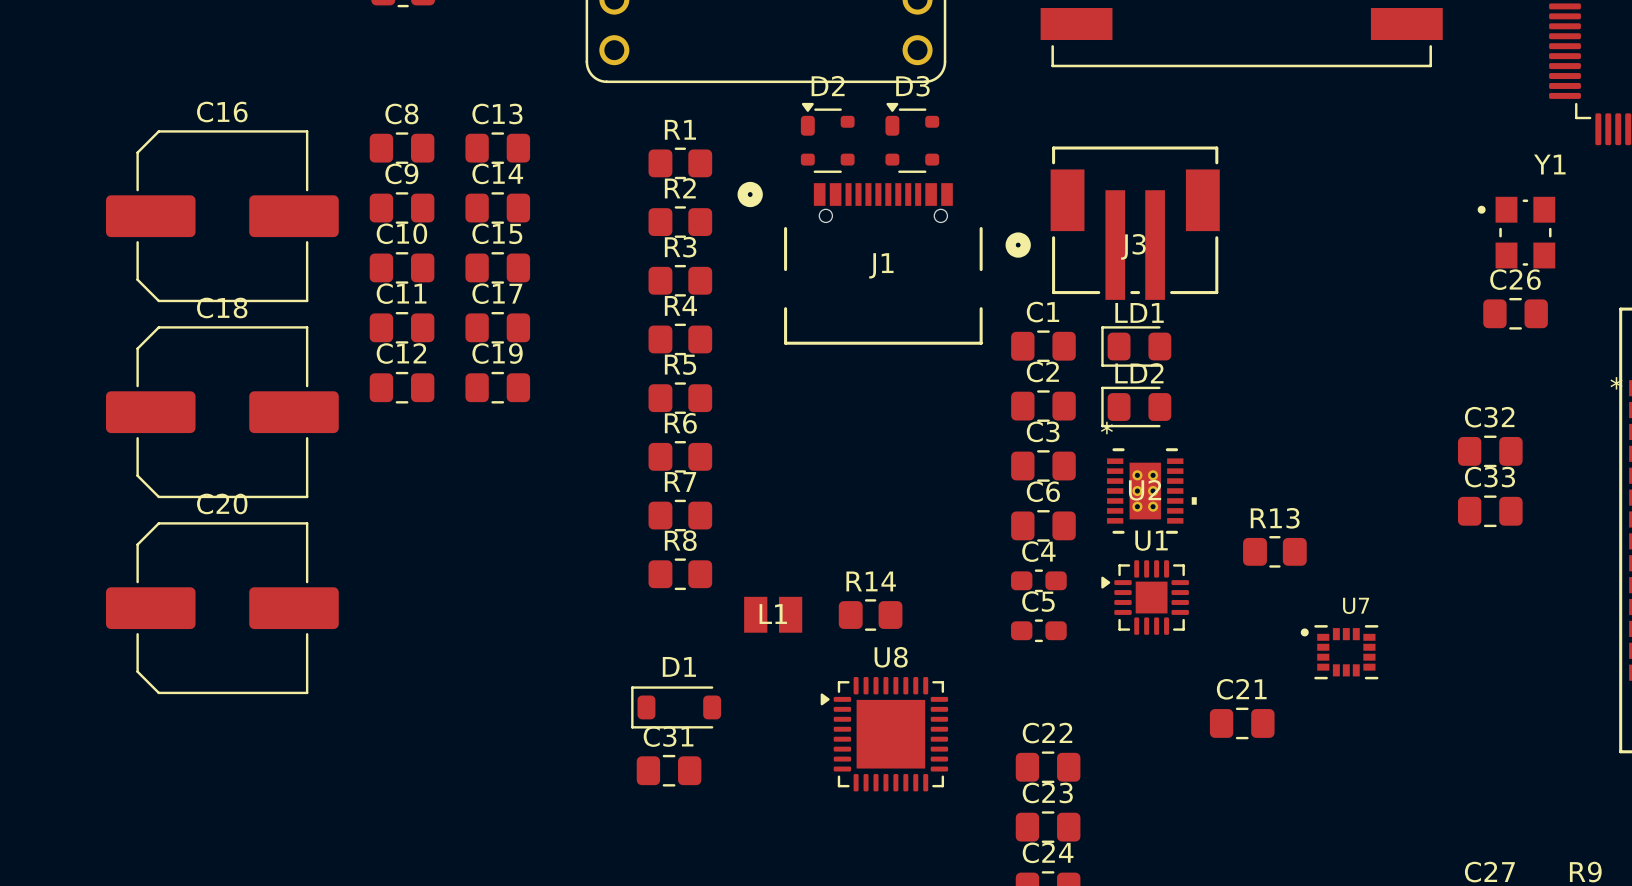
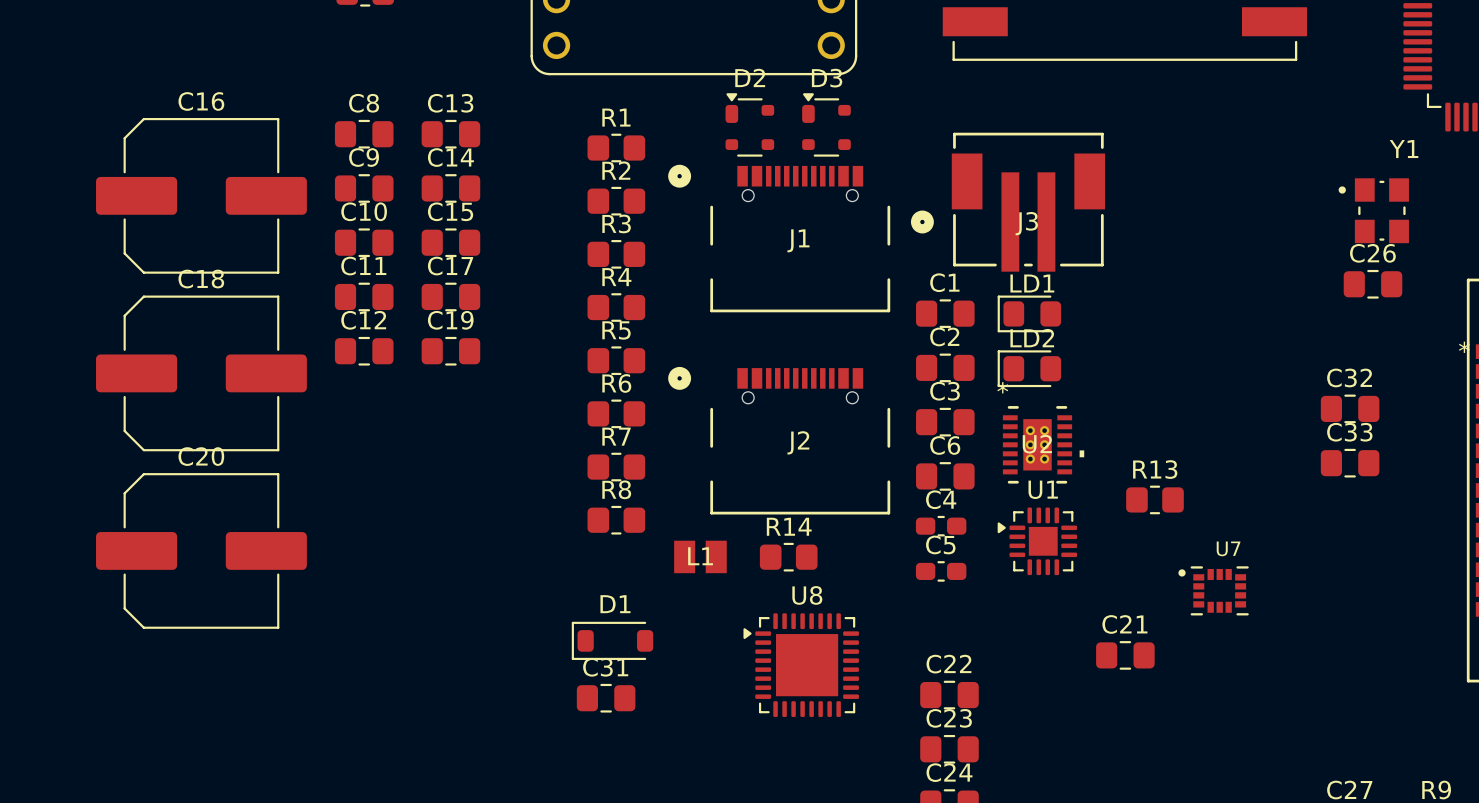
J2: none -> (779, 440)

